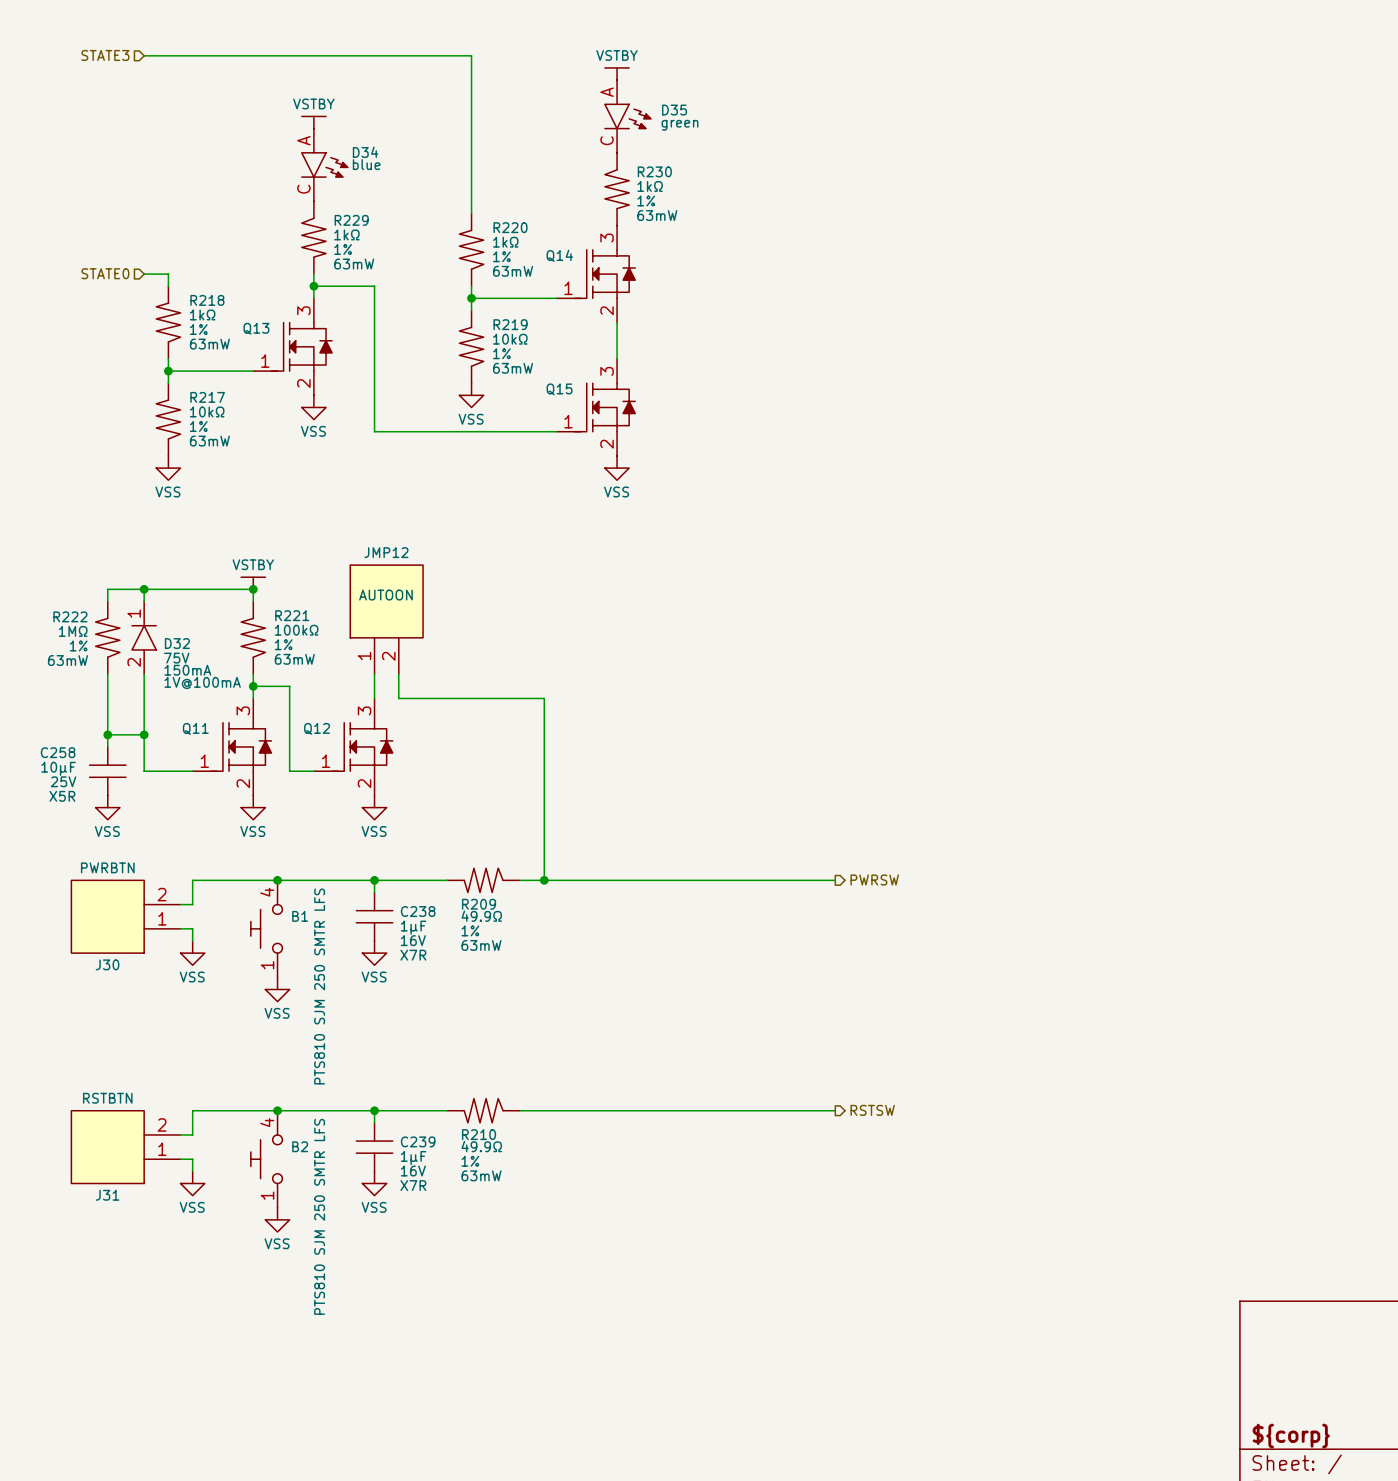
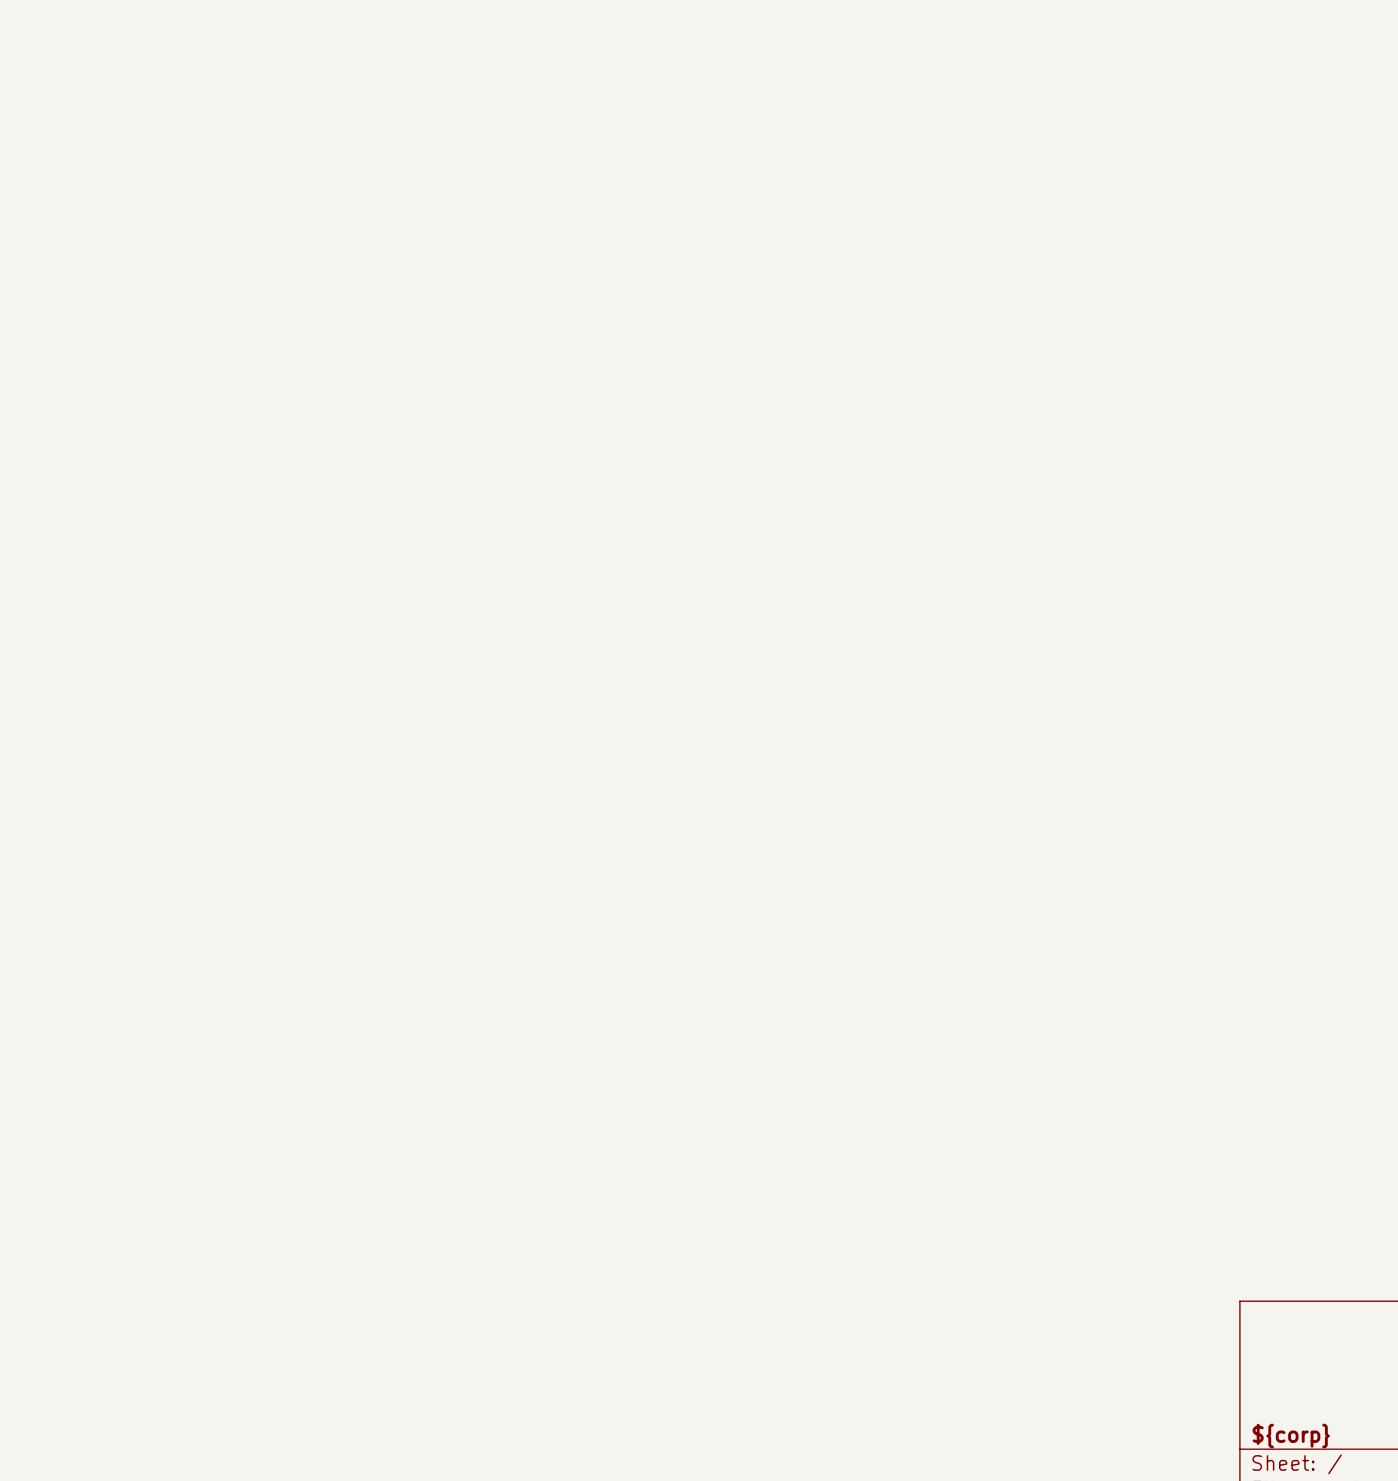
hierarchical label: STATE3 (105, 55) -> none
wire: (144, 55) (471, 55) (471, 213) -> none
power symbol: VSTBY (617, 74) -> none
D35: green (627, 116) -> none
power symbol: VSTBY (313, 122) -> none
D34: blue (324, 164) -> none
R230: (617, 189) -> none
R229: (313, 237) -> none
R220: (471, 249) -> none
hierarchical label: STATE0 (105, 273) -> none
wire: (144, 274) (168, 274) (168, 286) -> none
wire: (313, 274) (313, 298) -> none
Q14: (595, 274) -> none
wire: (313, 286) (374, 286) (374, 431) (556, 431) -> none
junction: (313, 286) -> none
wire: (471, 286) (471, 310) -> none
wire: (471, 298) (556, 298) -> none
junction: (471, 298) -> none
R218: (168, 322) -> none
wire: (617, 322) (617, 358) -> none
Q13: (292, 346) -> none
R219: (471, 346) -> none
wire: (168, 358) (168, 383) -> none
wire: (168, 371) (253, 371) -> none
junction: (168, 371) -> none
power symbol: VSS (471, 395) -> none
power symbol: VSS (313, 407) -> none
Q15: (595, 407) -> none
R217: (168, 419) -> none
power symbol: VSS (168, 468) -> none
power symbol: VSS (617, 468) -> none
power symbol: VSTBY (253, 583) -> none
wire: (144, 589) (144, 601) -> none
junction: (144, 589) -> none
junction: (253, 589) -> none
wire: (107, 601) (107, 589) (253, 589) (253, 601) -> none
JMP12: AUTOON (386, 619) -> none
R222: (107, 637) -> none
D32: (144, 637) -> none
R221: (253, 637) -> none
wire: (107, 674) (107, 746) -> none
wire: (144, 674) (144, 771) (192, 771) -> none
wire: (253, 674) (253, 698) -> none
wire: (374, 674) (374, 698) -> none
wire: (398, 674) (398, 698) (544, 698) (544, 880) -> none
wire: (253, 686) (289, 686) (289, 771) (313, 771) -> none
junction: (253, 686) -> none
wire: (107, 734) (144, 734) -> none
junction: (107, 734) -> none
junction: (144, 734) -> none
Q11: (232, 746) -> none
Q12: (353, 746) -> none
C258: (107, 771) -> none
power symbol: VSS (107, 807) -> none
power symbol: VSS (253, 807) -> none
power symbol: VSS (374, 807) -> none
hierarchical label: PWRSW (874, 879) -> none
junction: (277, 880) -> none
wire: (374, 880) (374, 892) -> none
junction: (374, 880) -> none
wire: (447, 880) (192, 880) (192, 904) (180, 904) -> none
R209: (483, 880) -> none
wire: (520, 880) (835, 880) -> none
junction: (544, 880) -> none
J30: PWRBTN (125, 916) -> none
C238: (374, 916) -> none
wire: (180, 928) (192, 928) (192, 940) -> none
B1: (266, 928) -> none
power symbol: VSS (192, 953) -> none
power symbol: VSS (374, 953) -> none
power symbol: VSS (277, 989) -> none
junction: (277, 1110) -> none
wire: (374, 1110) (374, 1122) -> none
junction: (374, 1110) -> none
wire: (447, 1110) (192, 1110) (192, 1134) (180, 1134) -> none
R210: (483, 1110) -> none
wire: (520, 1110) (835, 1110) -> none
hierarchical label: RSTSW (872, 1110) -> none
J31: RSTBTN (125, 1147) -> none
C239: (374, 1147) -> none
wire: (180, 1159) (192, 1159) (192, 1171) -> none
B2: (266, 1159) -> none
power symbol: VSS (192, 1183) -> none
power symbol: VSS (374, 1183) -> none
power symbol: VSS (277, 1219) -> none

